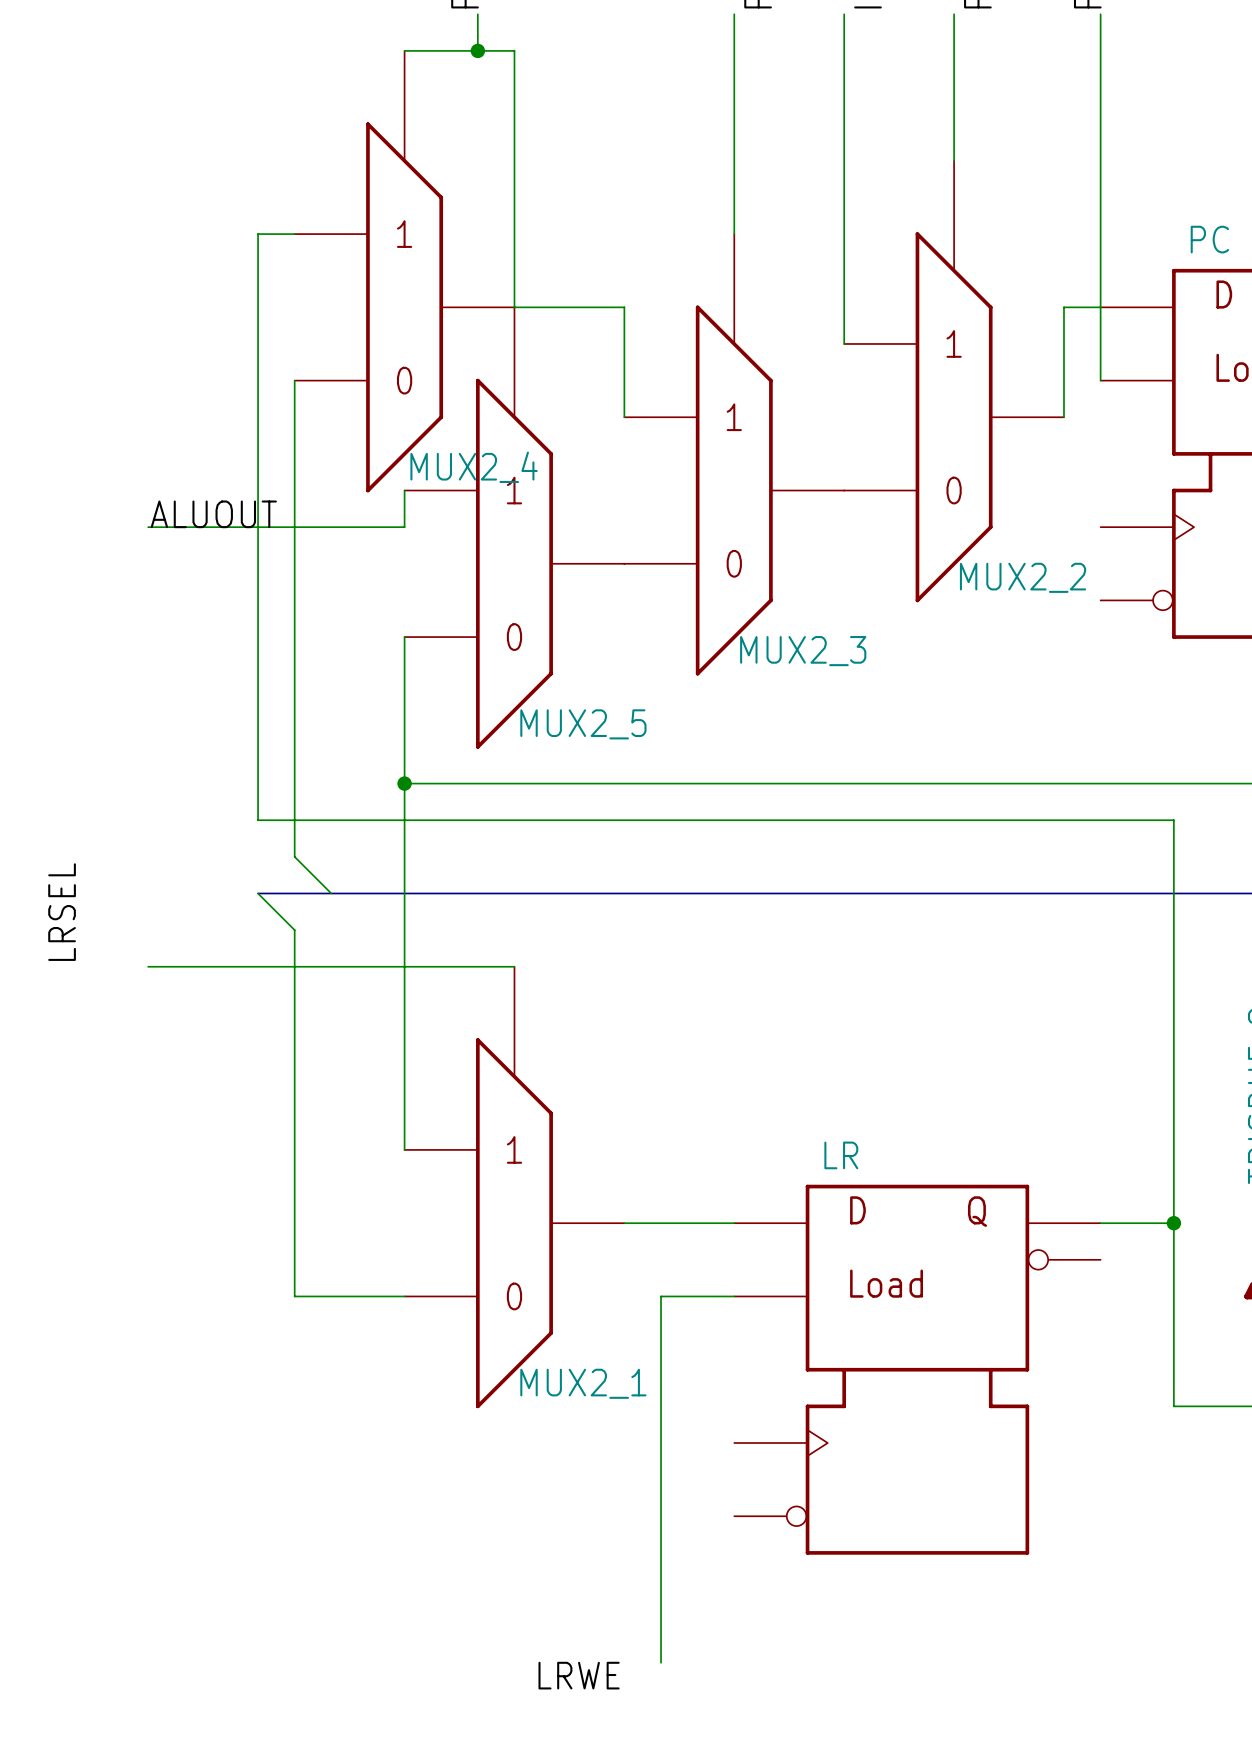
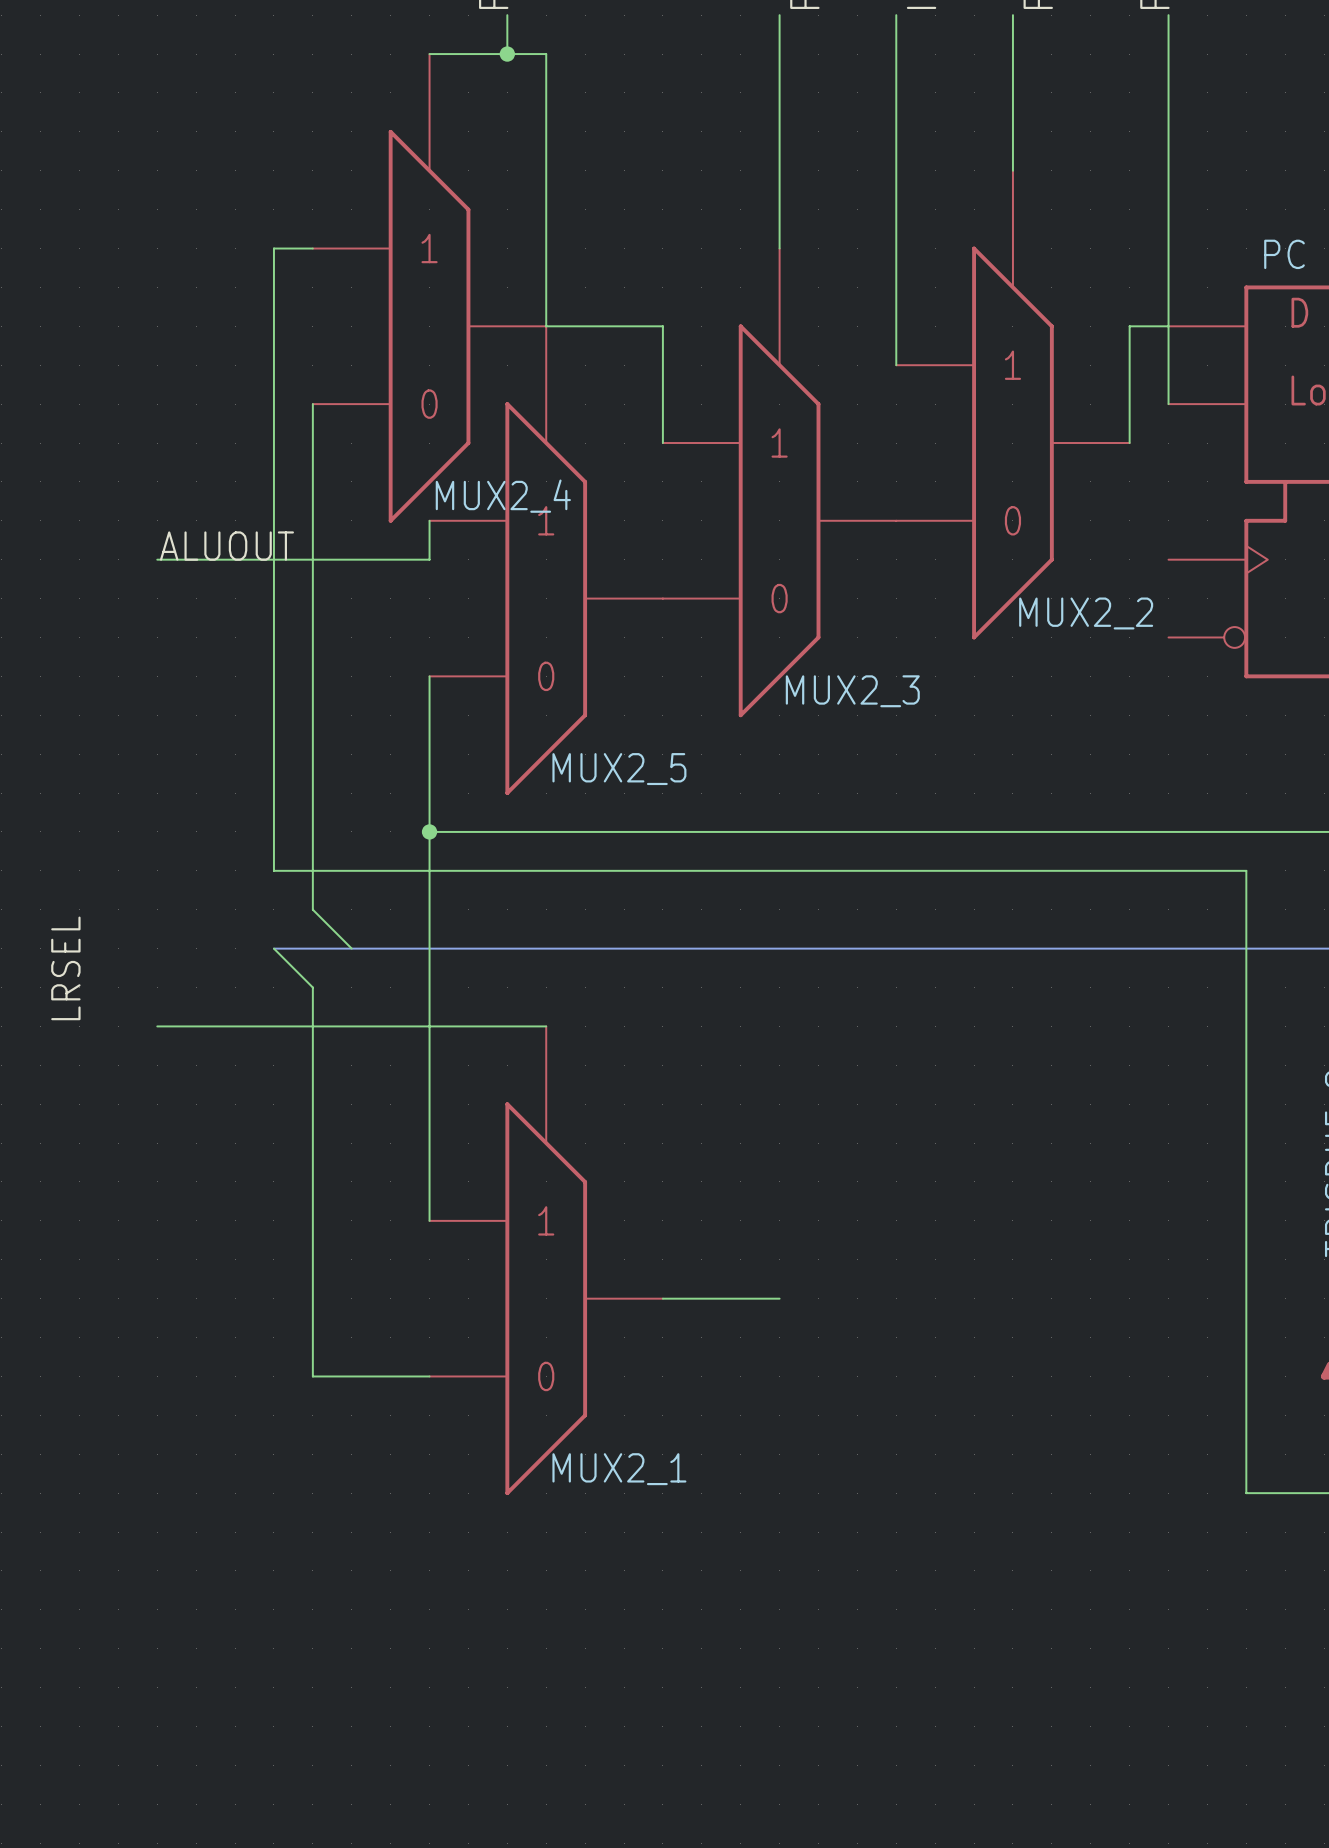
wire: (1100, 1223) (1173, 1223) -> none
junction: (1173, 1223) -> none
wire: (734, 1296) (661, 1296) (661, 1662) -> none
LR: (917, 1369) -> none
label: LRWE (579, 1675) -> none

